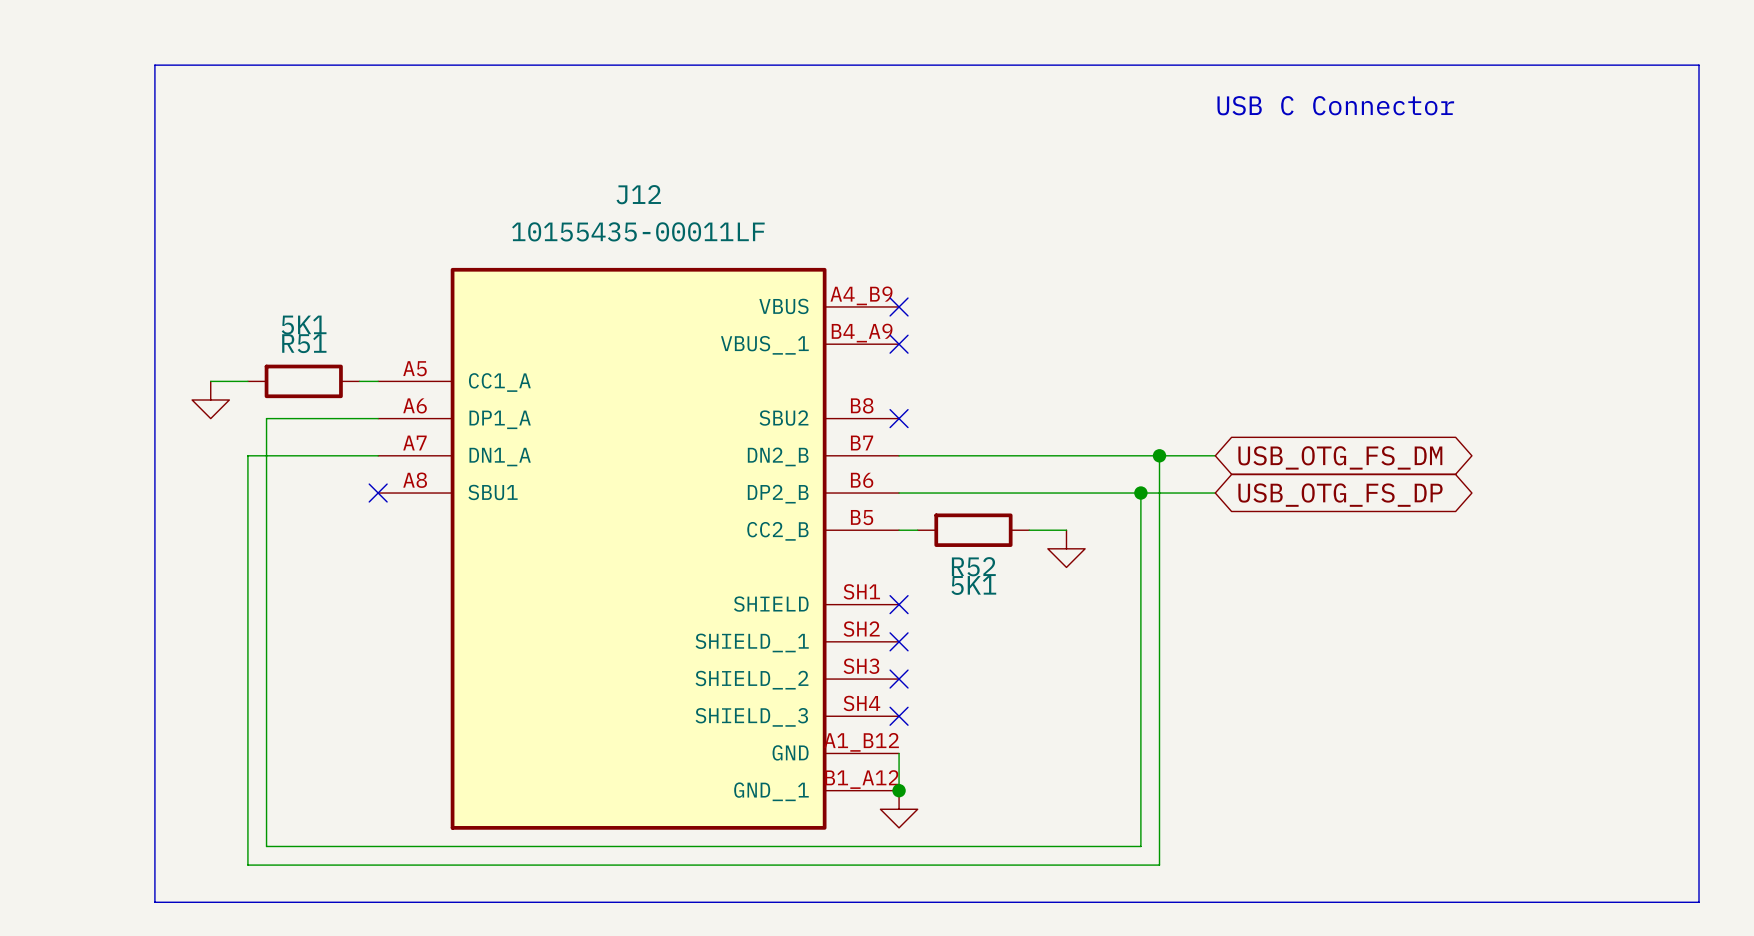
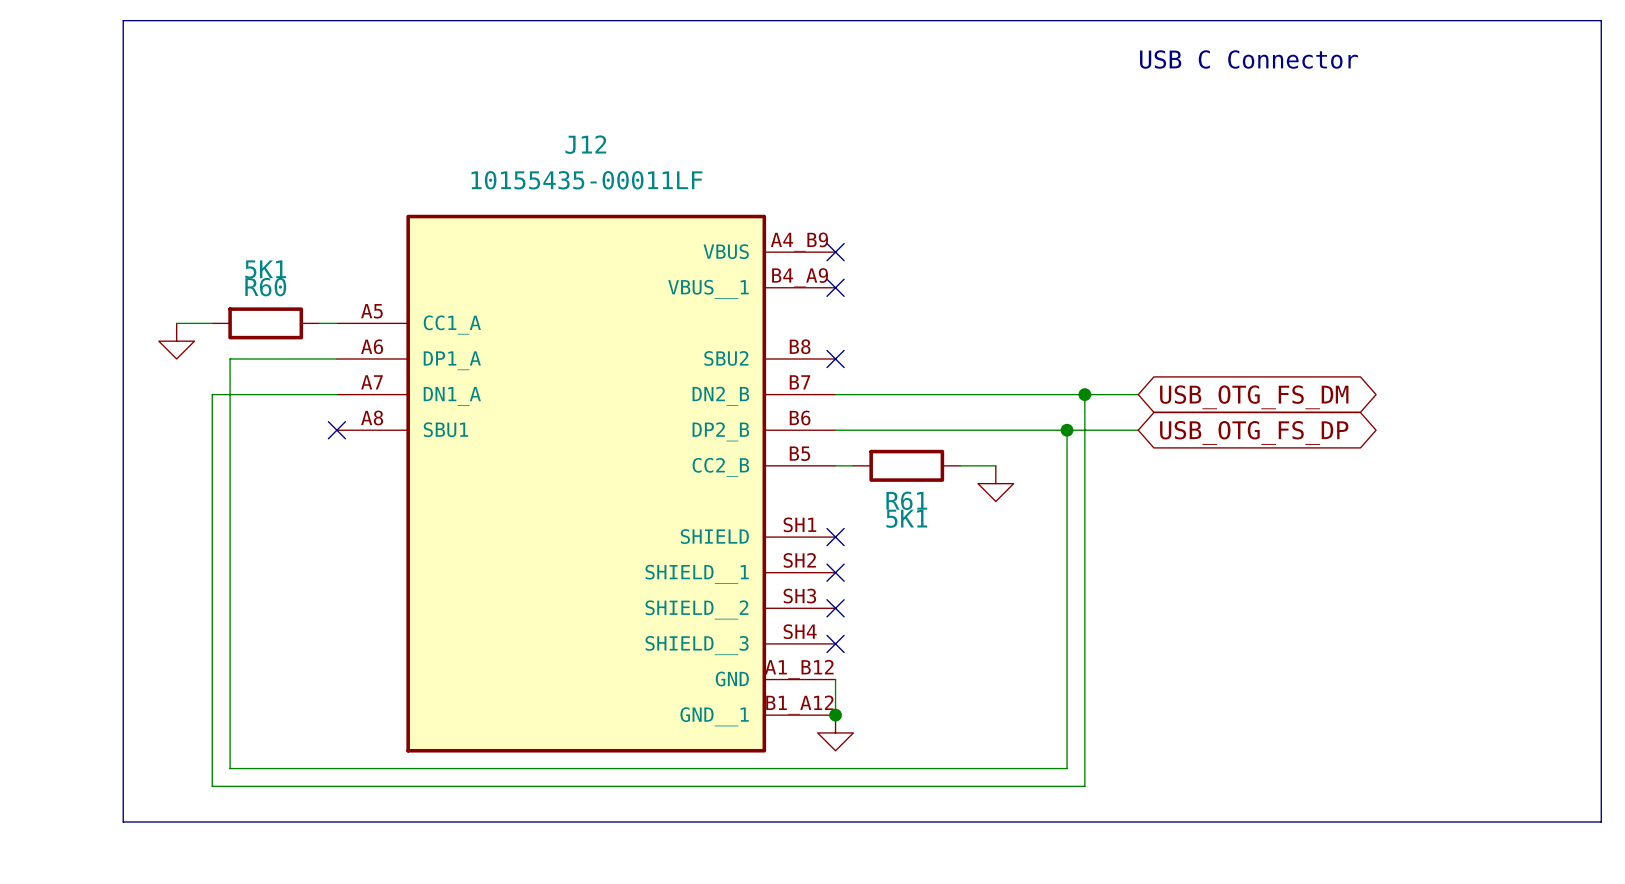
R51 name: R51 (304, 343) -> R60 (265, 287)
R52 name: R52 (973, 566) -> R61 (906, 500)

